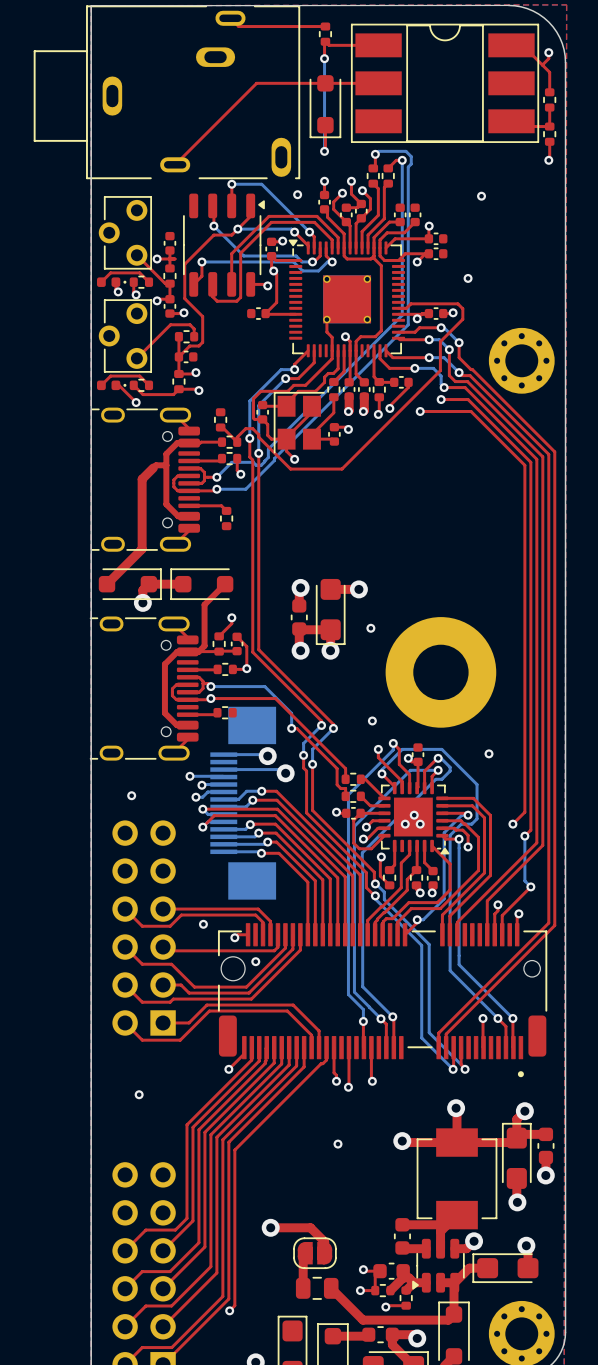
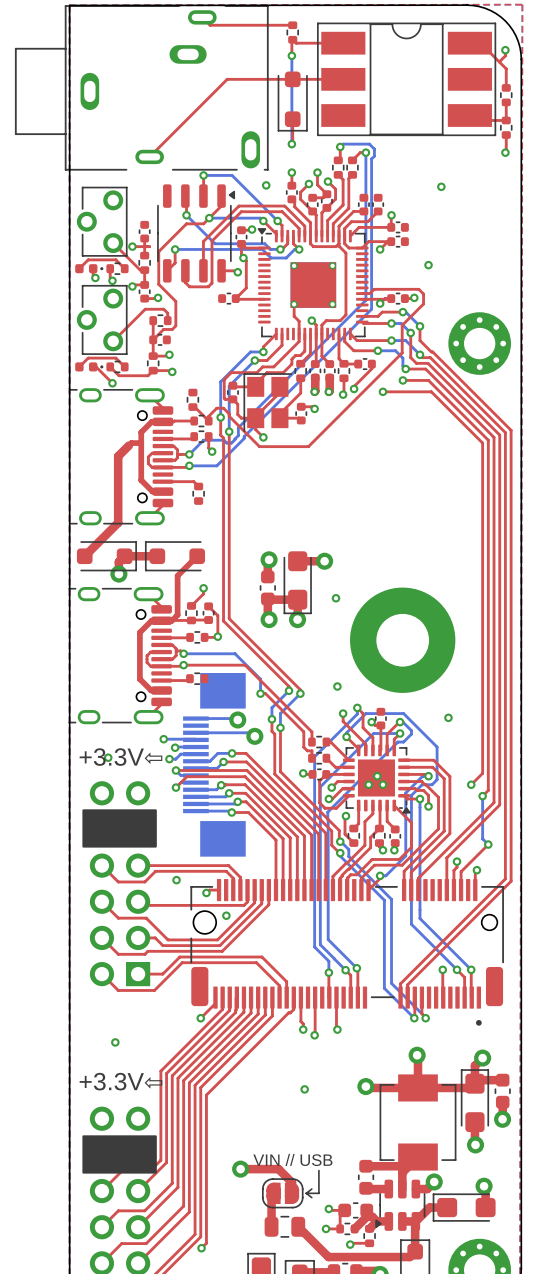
text: none -> +3.3V⇦ (120, 757)
drawing: none -> [82, 809, 157, 848]
text: none -> +3.3V⇦ (120, 1081)
drawing: none -> [82, 1135, 157, 1174]
text: none -> VIN // USB (292, 1159)
line: none -> (318, 1170) (318, 1193) (306, 1193)
line: none -> (311, 1189) (306, 1193)
line: none -> (306, 1193) (311, 1197)

